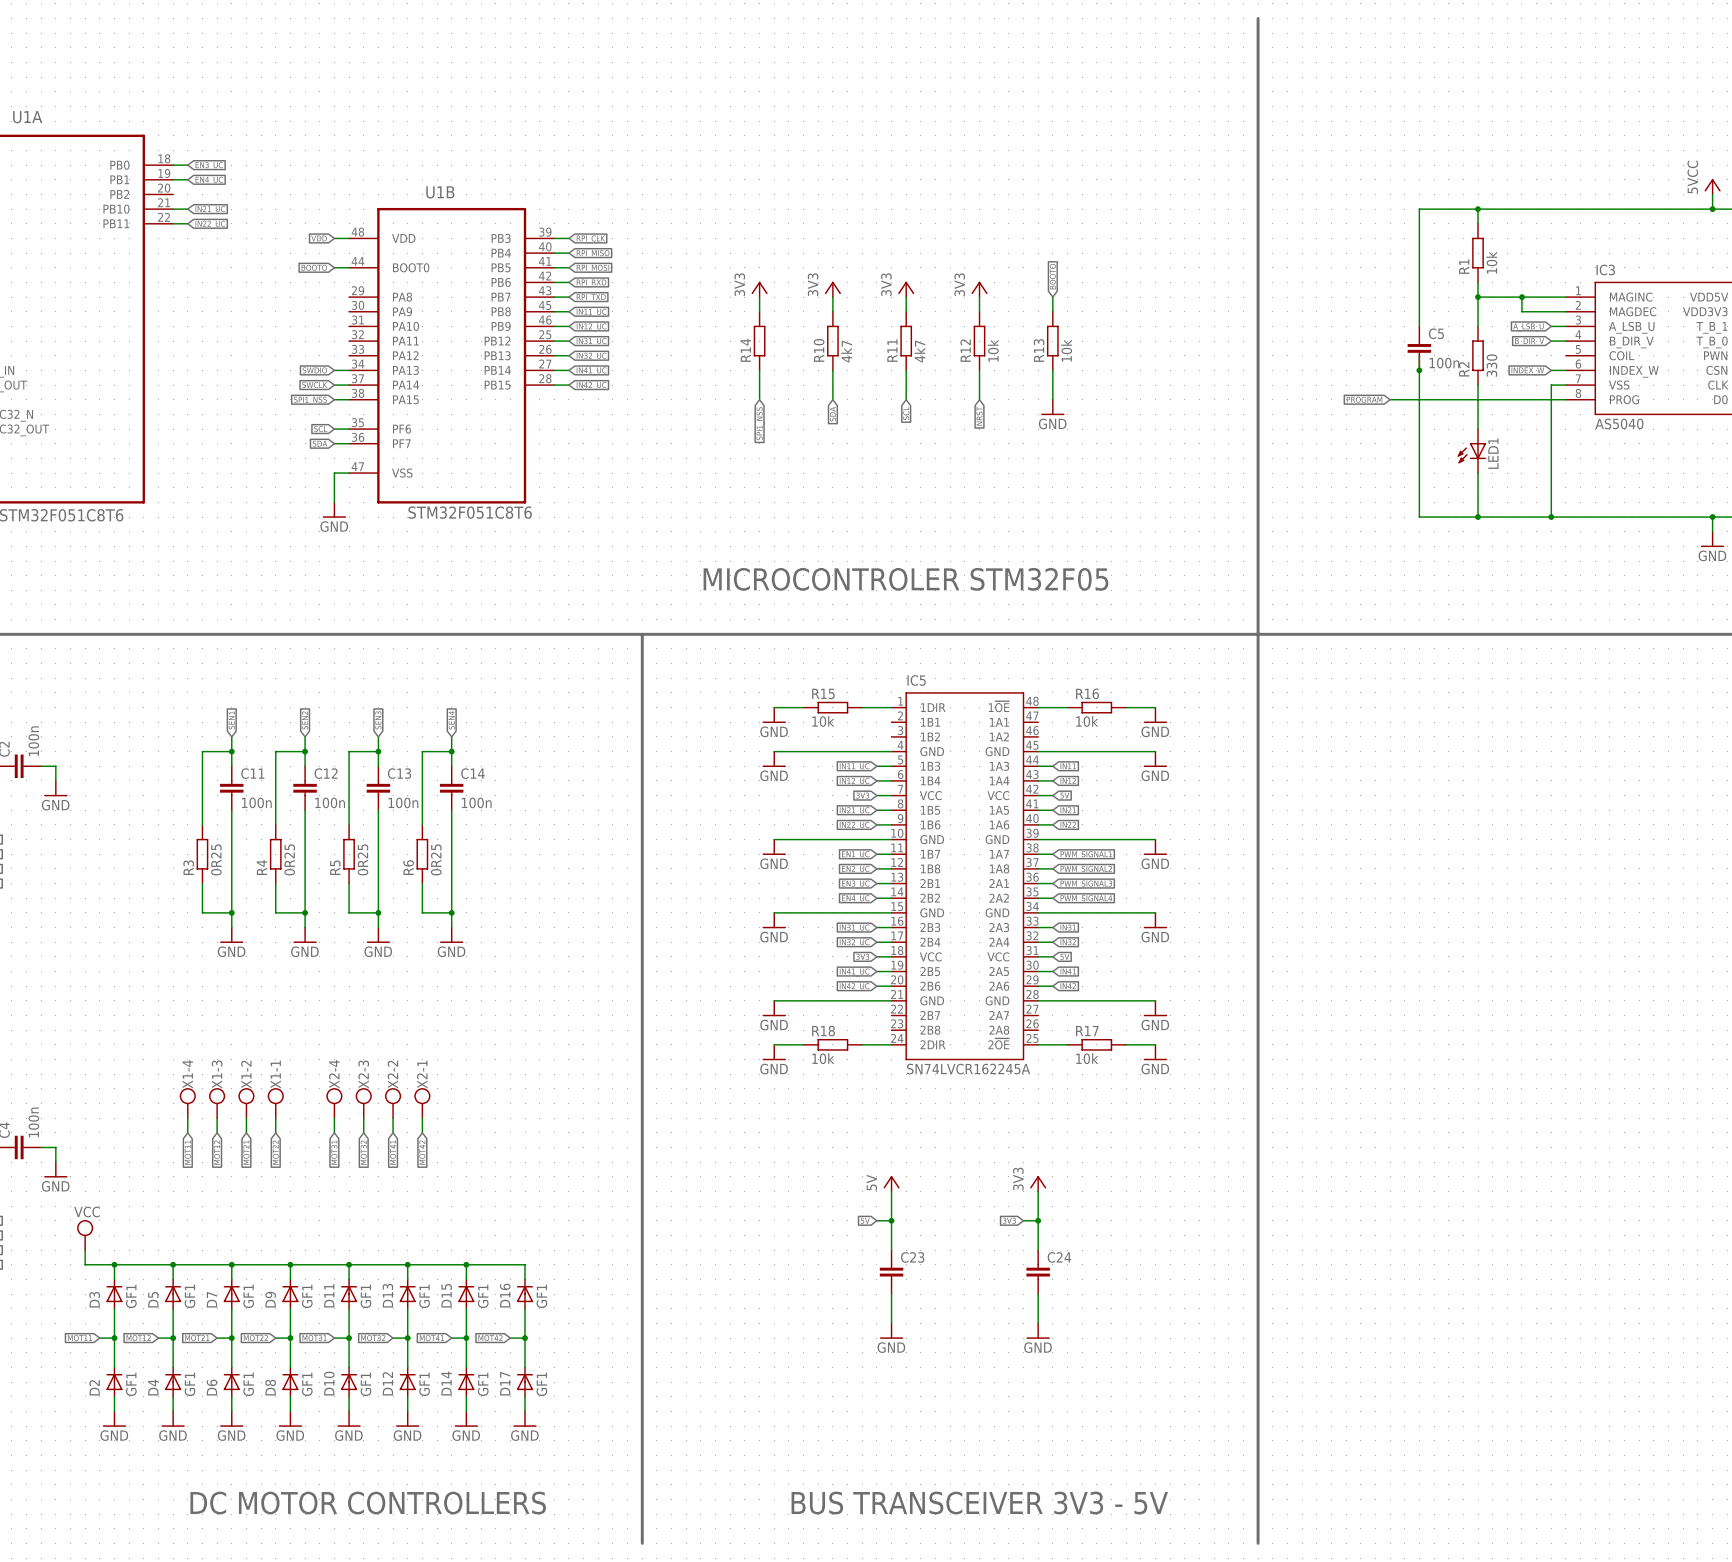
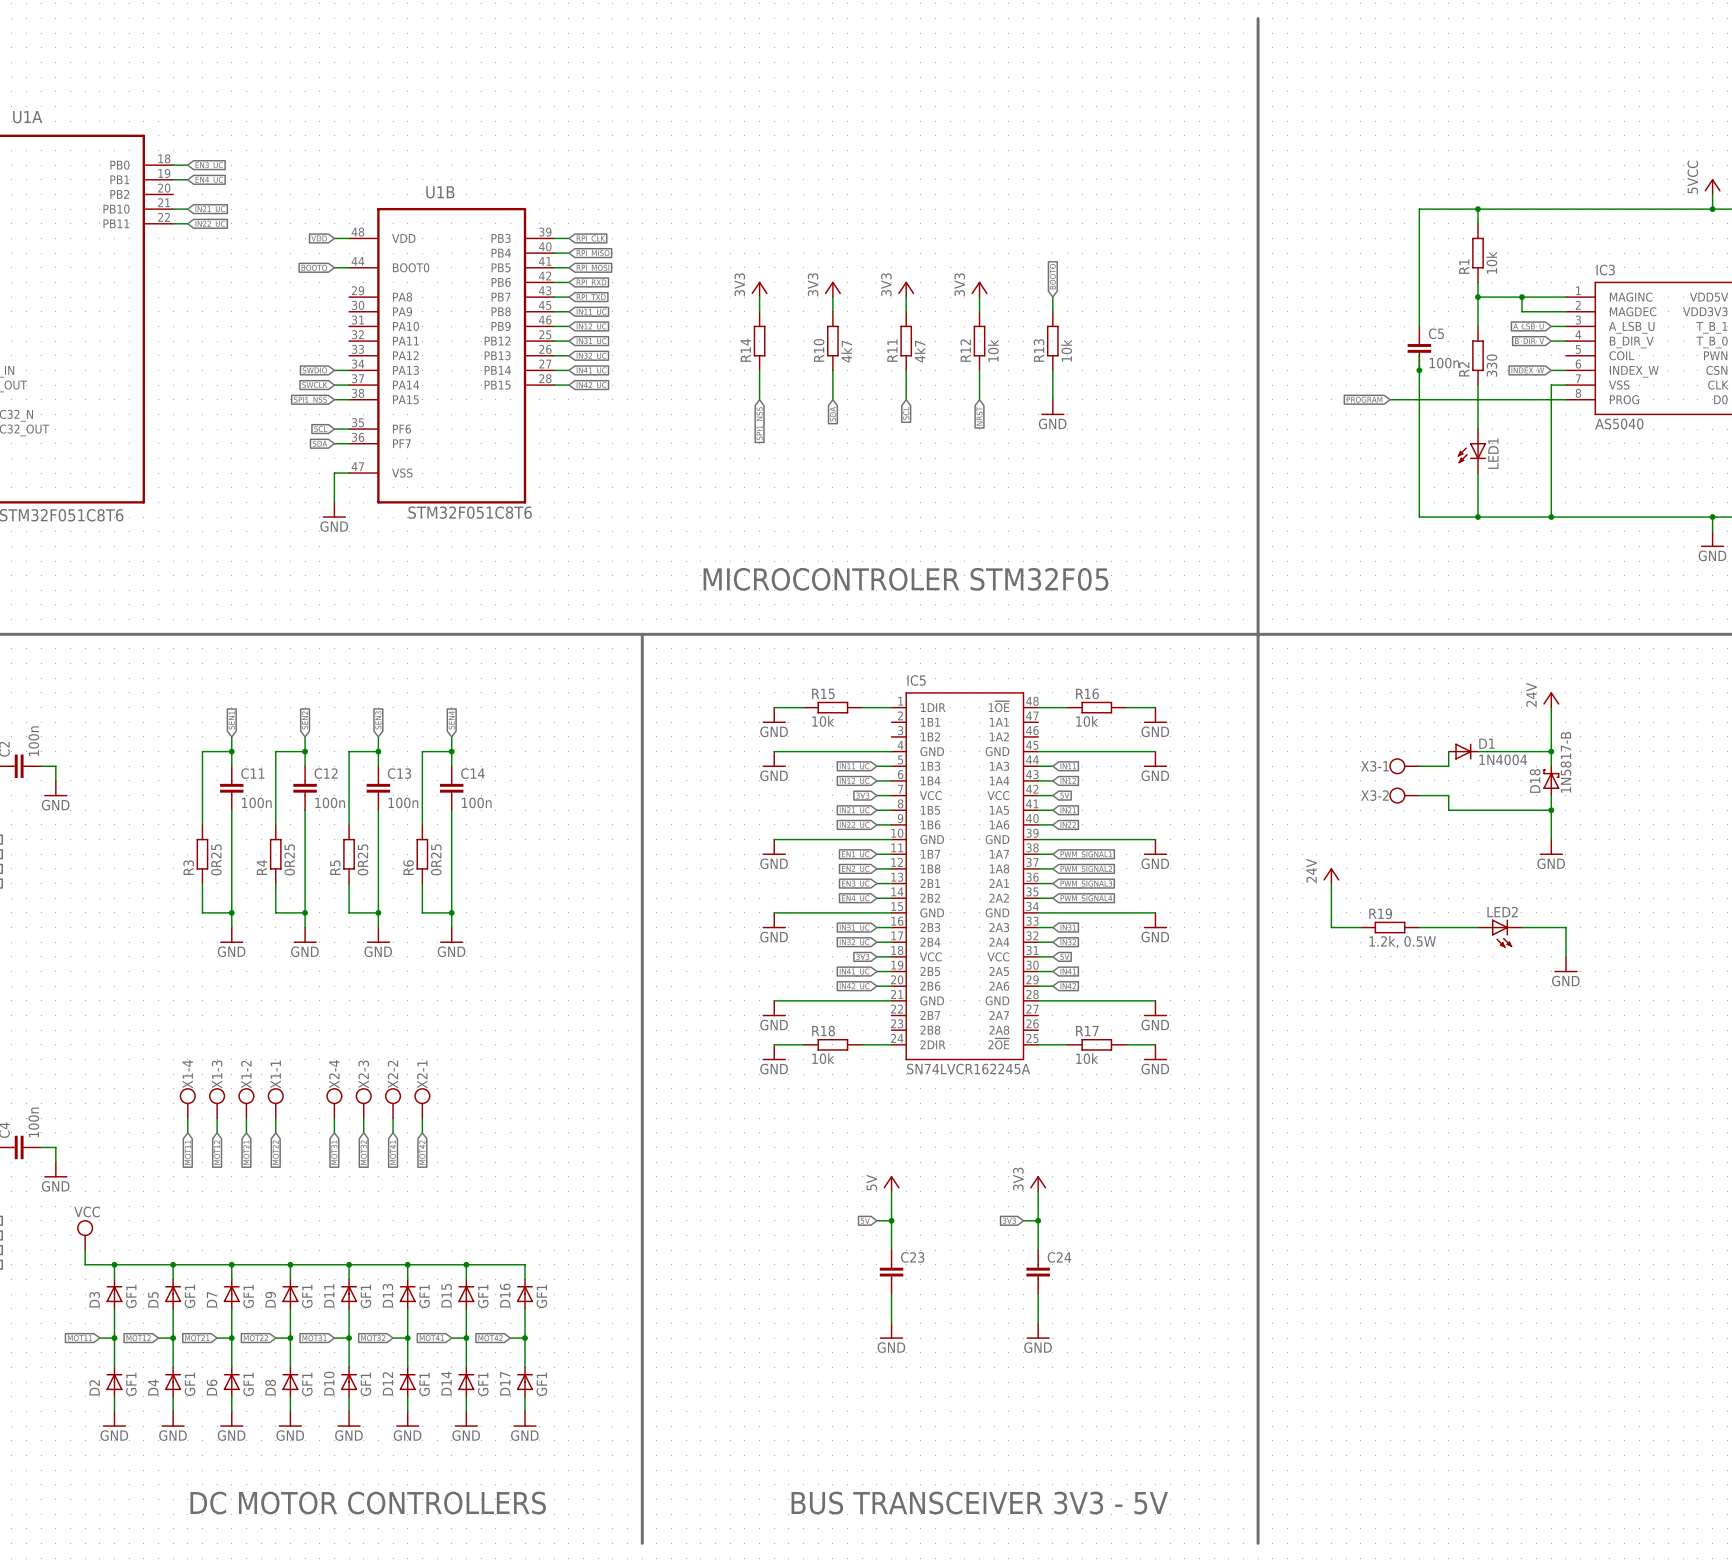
power symbol: none -> 24V (1551, 699)
wire: none -> (1551, 707) (1551, 766)
wire: none -> (1448, 751) (1448, 766) (1419, 766)
D1: none -> 1N4004 (1463, 751)
wire: none -> (1478, 751) (1551, 751)
junction: none -> (1551, 751)
X3-1: none -> (1404, 766)
D18: none -> 1N5817-B (1551, 780)
X3-2: none -> (1404, 795)
wire: none -> (1419, 795) (1448, 795) (1448, 810) (1551, 810)
wire: none -> (1551, 795) (1551, 839)
junction: none -> (1551, 810)
power symbol: none -> GND (1551, 847)
power symbol: none -> 24V (1331, 875)
wire: none -> (1331, 883) (1331, 927) (1360, 927)
R19: none -> 1.2k, 0.5W (1390, 927)
wire: none -> (1419, 927) (1478, 927)
wire: none -> (1521, 927) (1565, 927) (1565, 956)
LED2: none -> (1500, 933)
power symbol: none -> GND (1565, 964)

